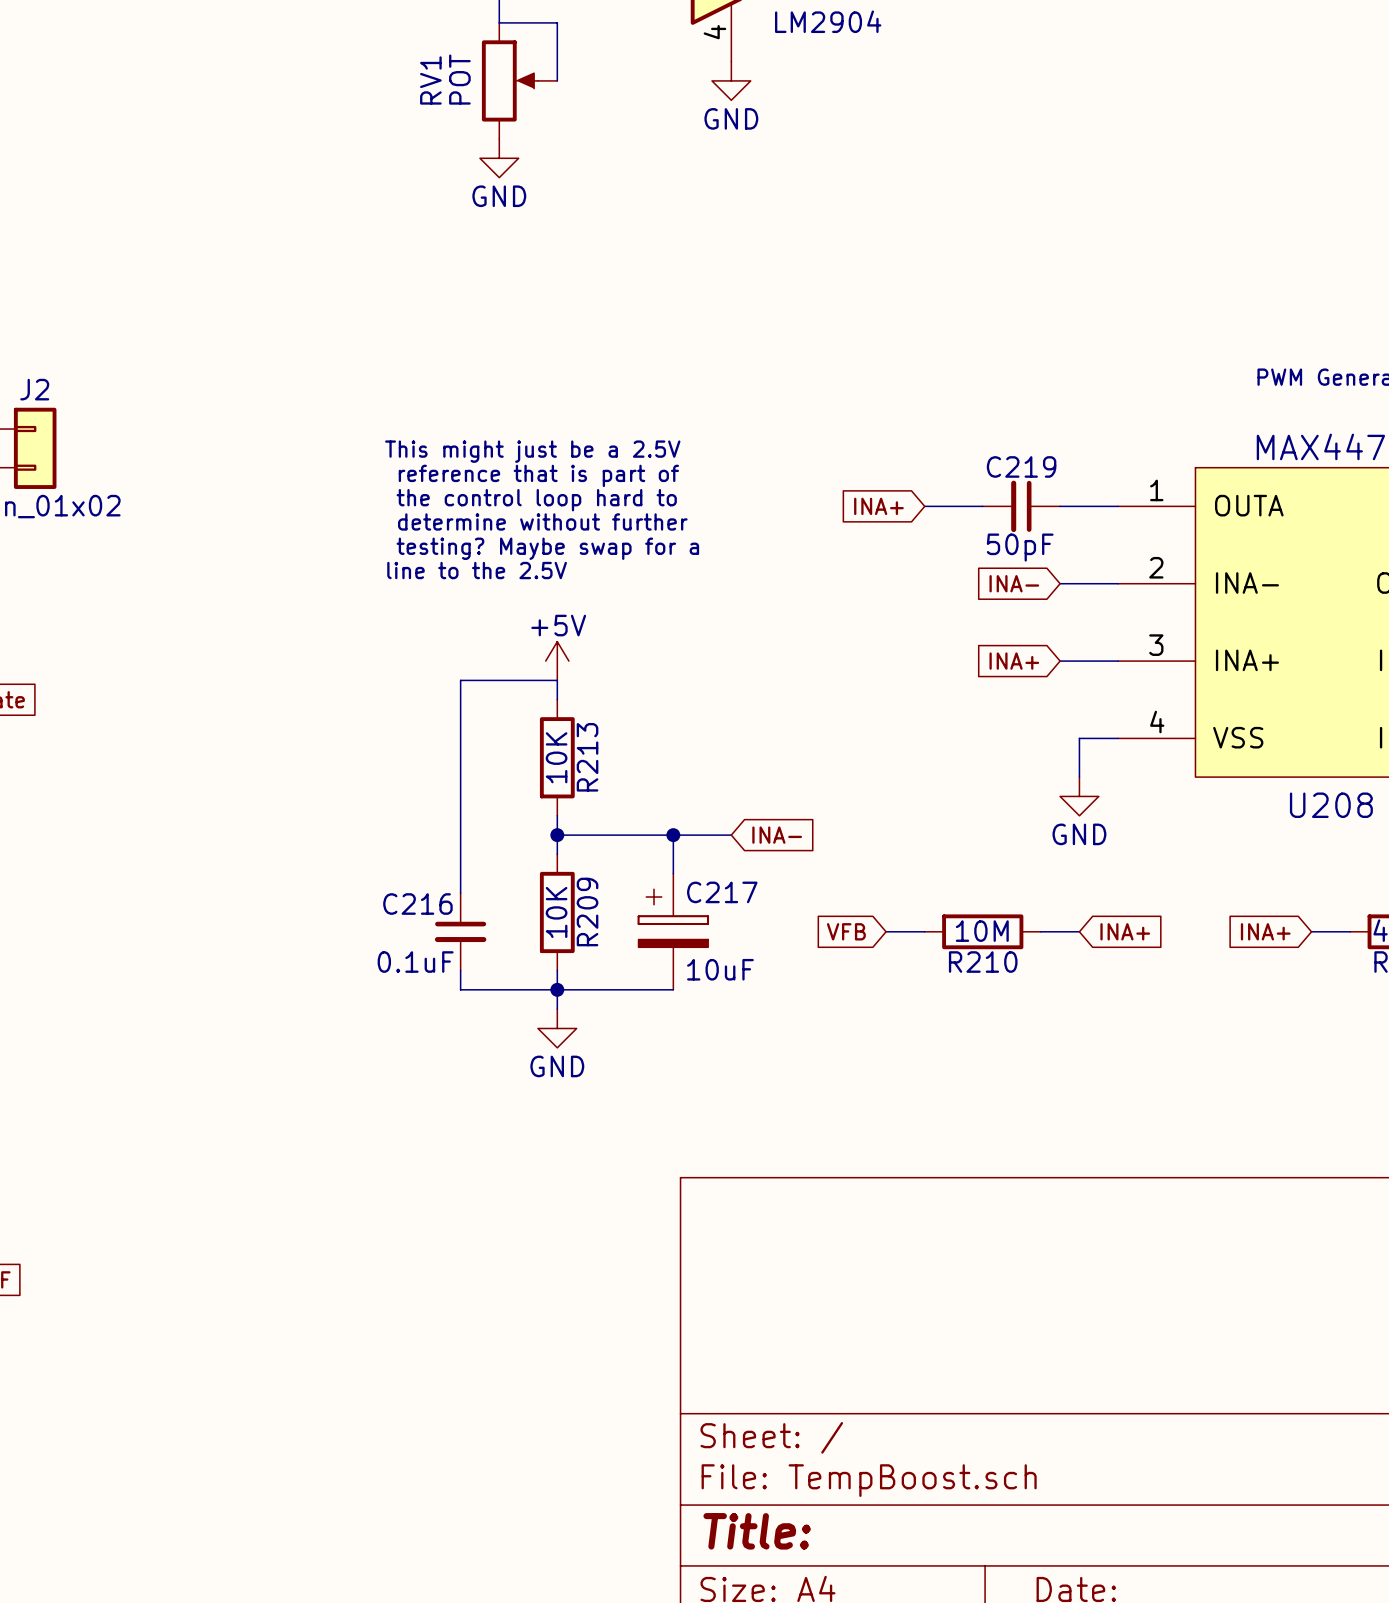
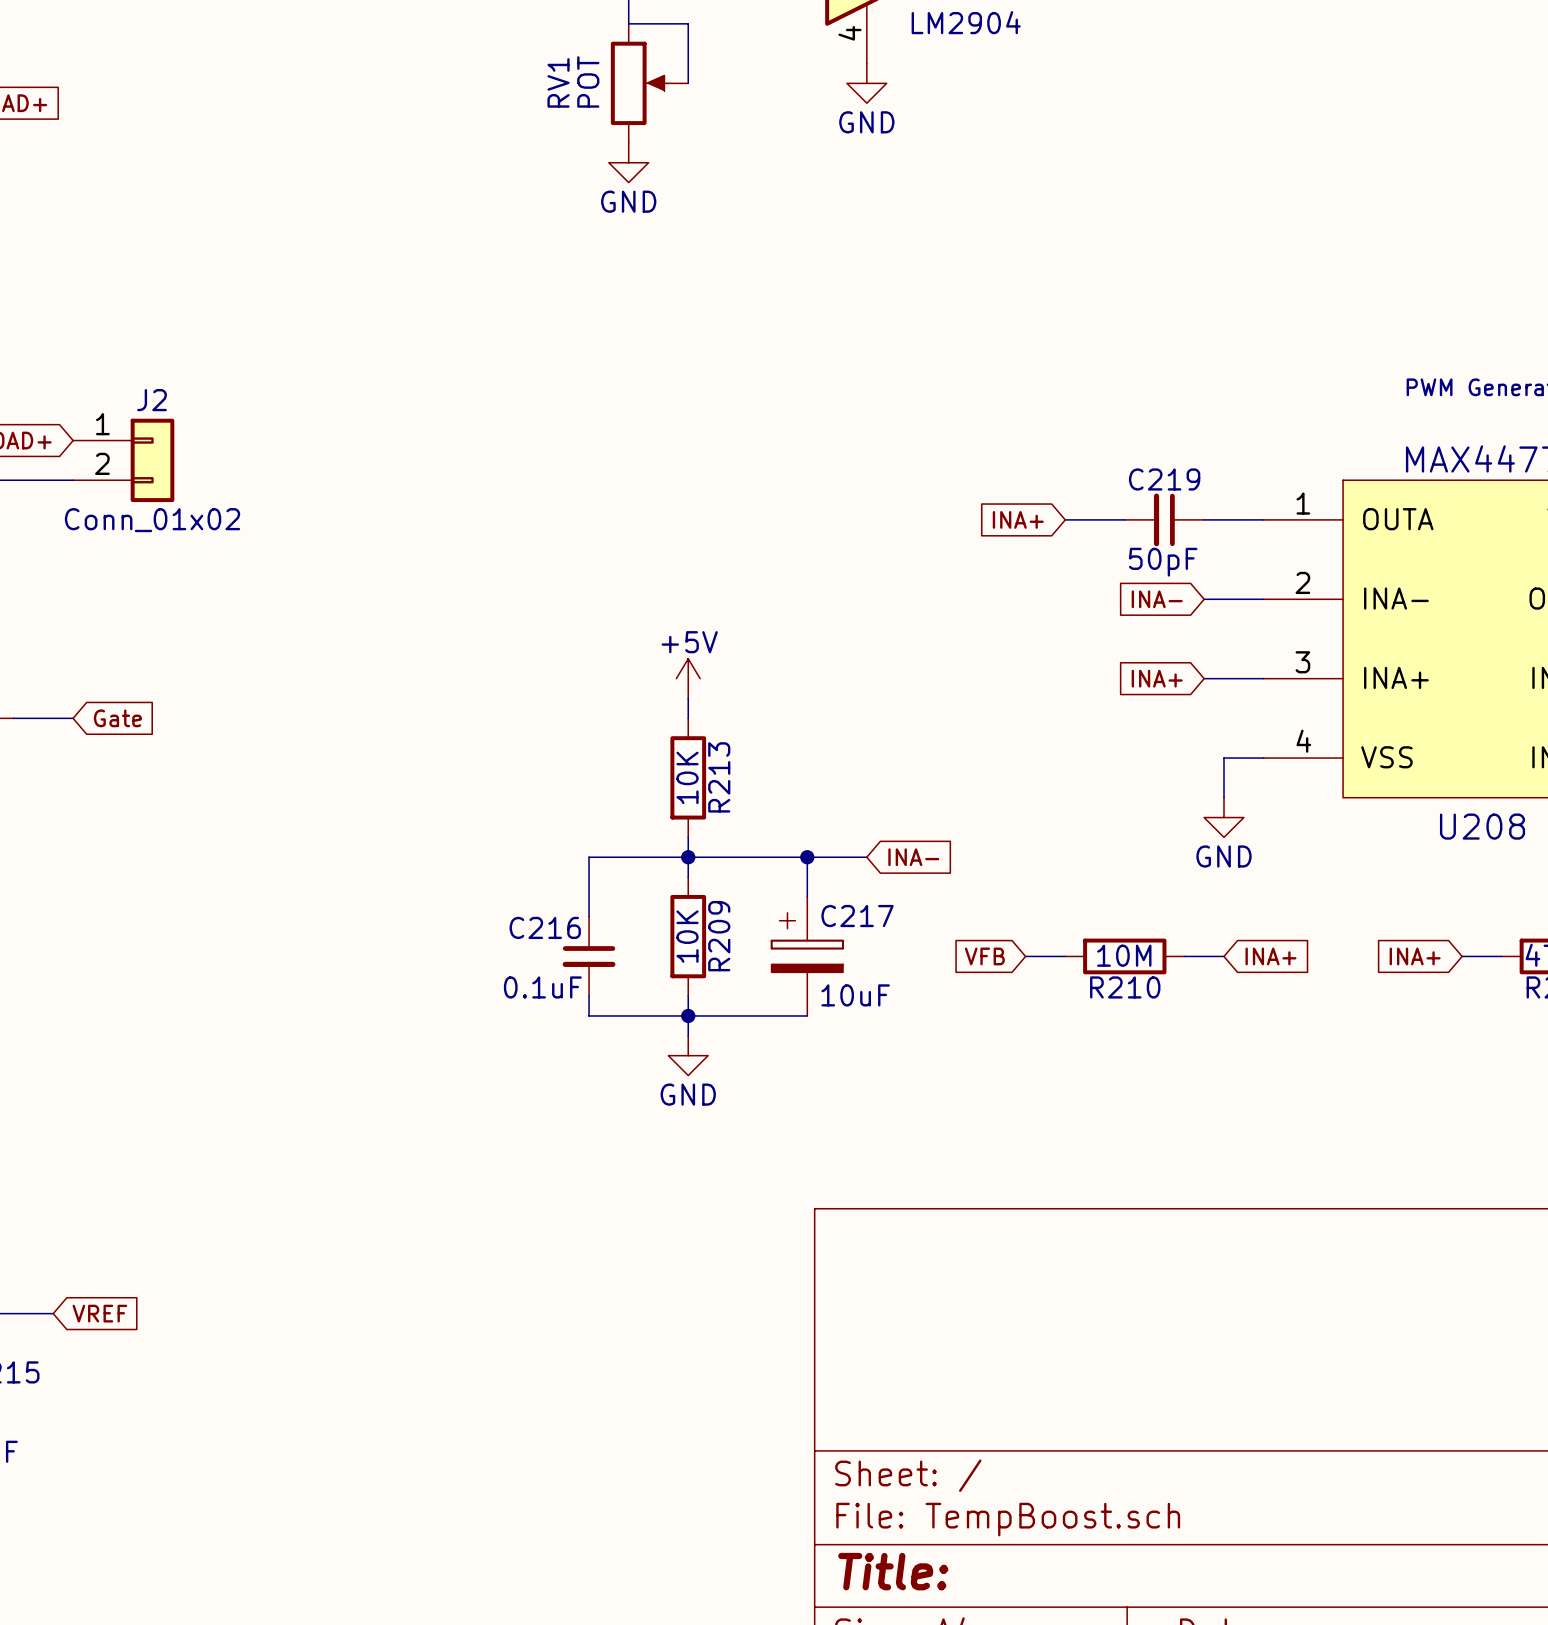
text: This might just be a 2.5V (532, 451) -> none
text: reference that is part of (538, 475) -> none
text: the control loop hard to (536, 500) -> none
text: determine without further (542, 521) -> none
text: testing? Maybe swap for a (547, 548) -> none
text: line to the 2.5V (477, 570) -> none
wire: (557, 680) (460, 680) (460, 835) -> (688, 857) (589, 857)

